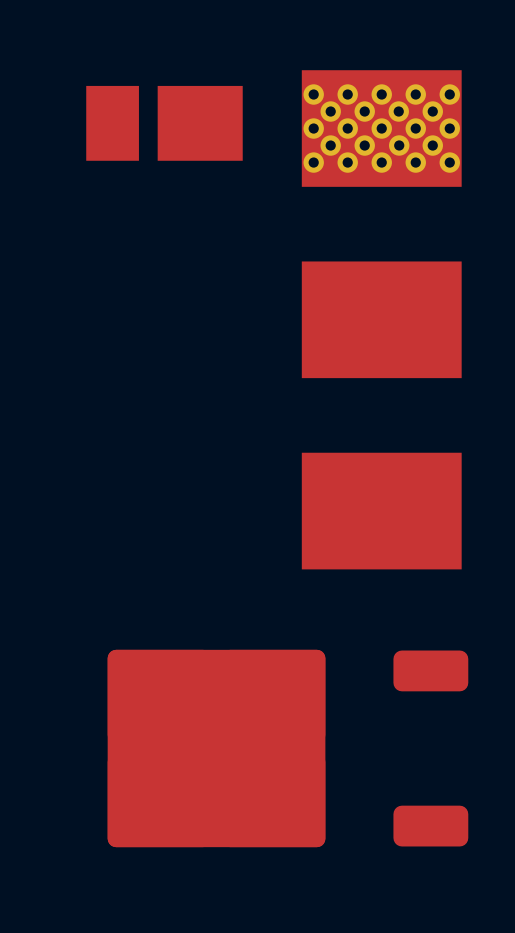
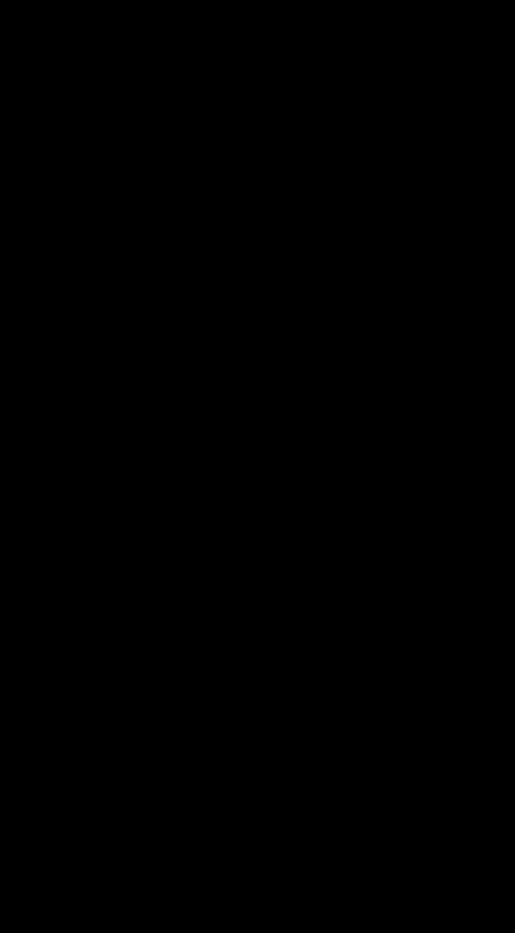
part: (164, 123) -> none
part: (381, 128) -> none
part: (381, 319) -> none
part: (381, 511) -> none
part: (287, 748) -> none

